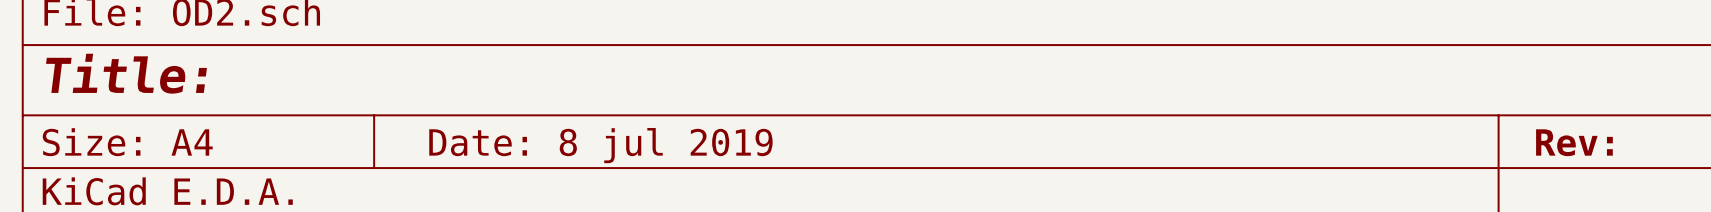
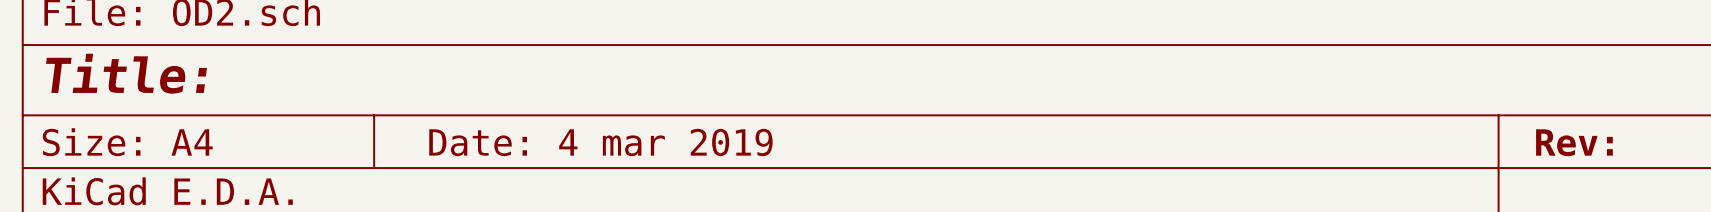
title block: Date: 8 jul 2019 (600, 145) -> Date: 4 mar 2019 (600, 142)

